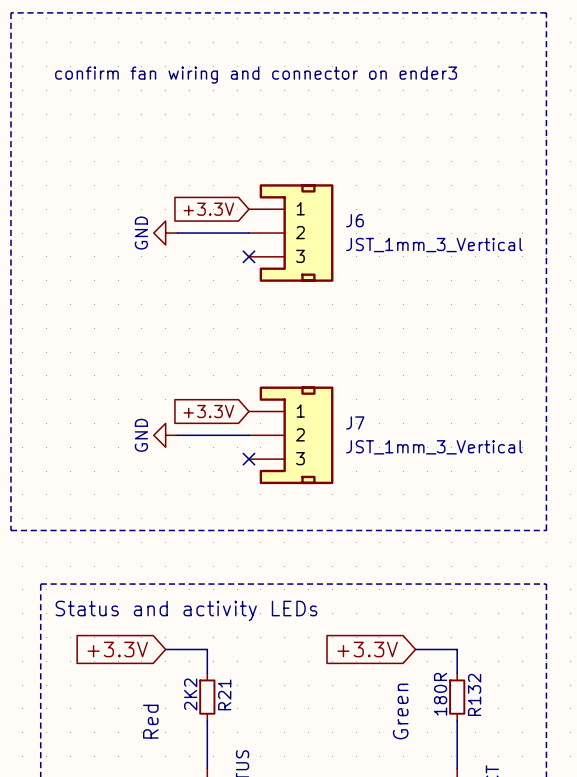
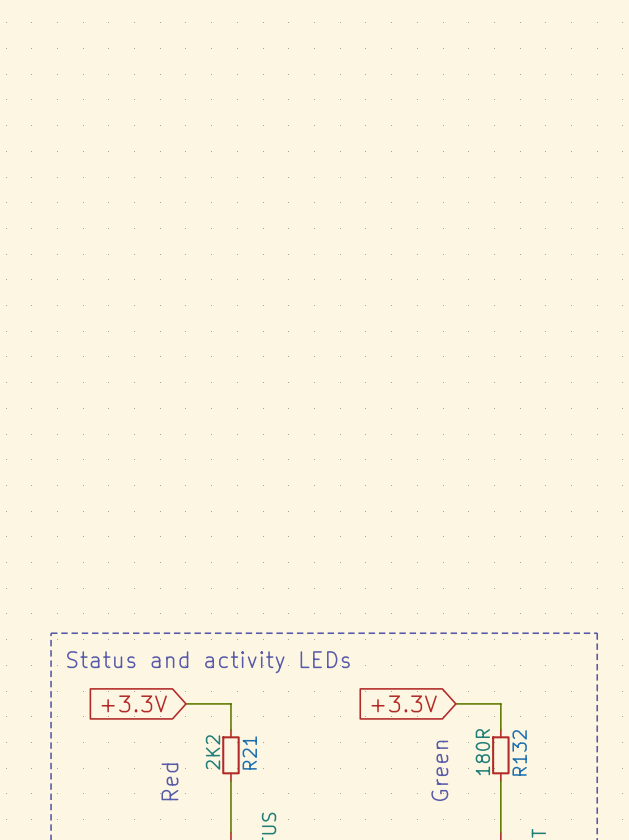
line: (10, 12) (10, 530) (546, 530) (546, 12) (10, 12) -> none
text: confirm fan wiring and connector on ender3 (256, 75) -> none
global label: +3.3V (208, 209) -> none
power symbol: GND (165, 233) -> none
wire: (177, 233) (248, 233) -> none
J6: JST_1mm_3_Vertical (291, 233) -> none
no-connect mark: (248, 256) -> none
global label: +3.3V (208, 411) -> none
power symbol: GND (165, 435) -> none
wire: (177, 435) (248, 435) -> none
J7: JST_1mm_3_Vertical (291, 435) -> none
no-connect mark: (248, 459) -> none

